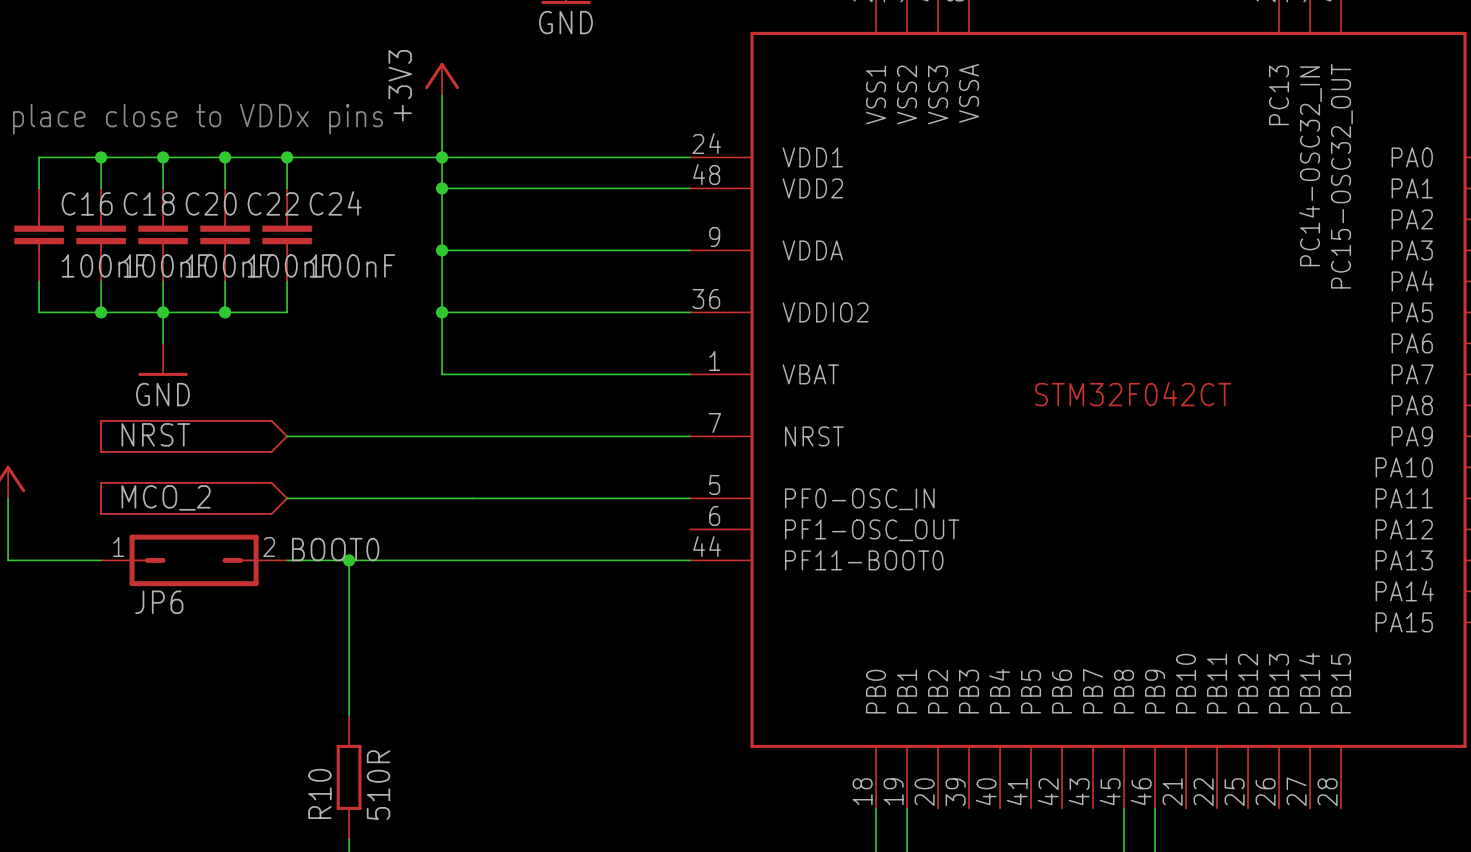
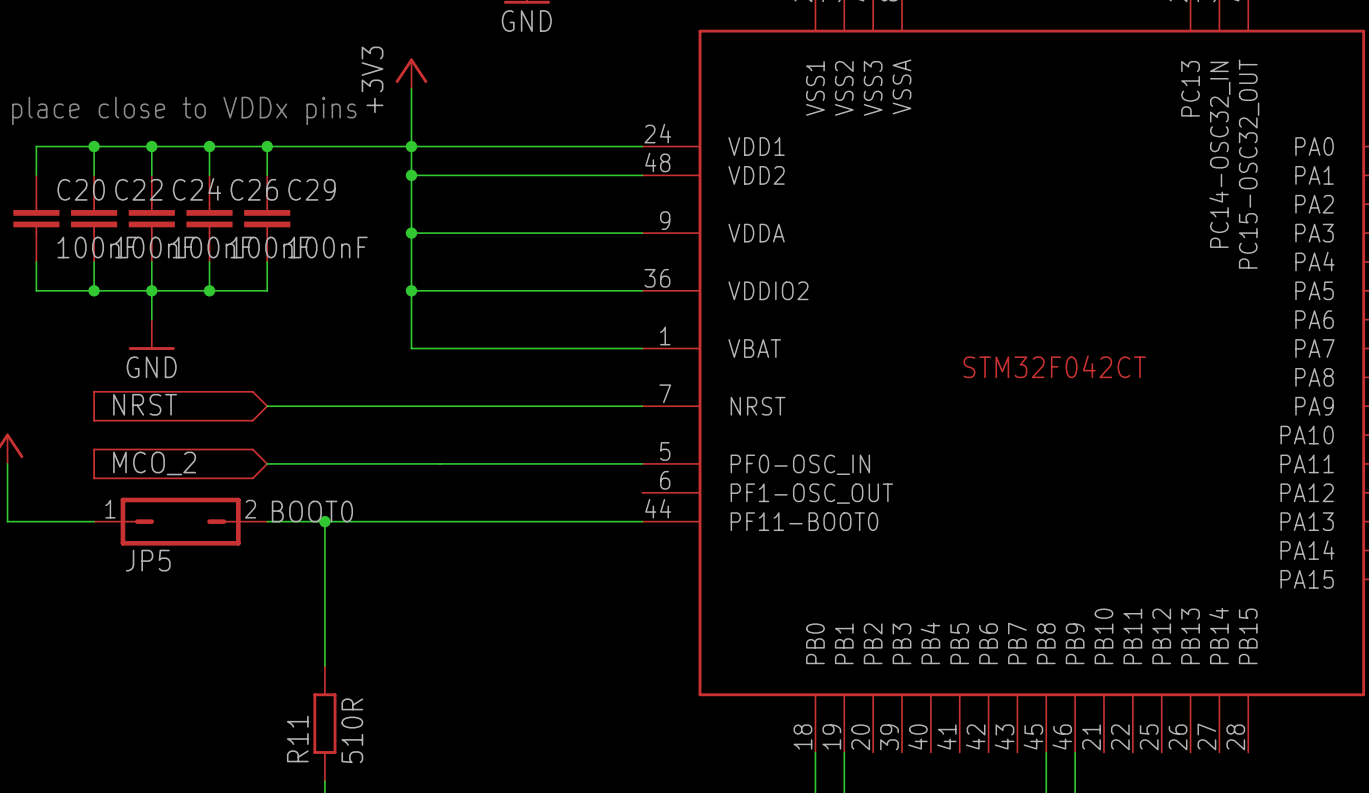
C16 name: C16 (87, 203) -> C20 (81, 189)
C18 name: C18 (149, 203) -> C22 (138, 189)
C20 name: C20 (211, 203) -> C24 (197, 189)
C22 name: C22 (273, 203) -> C26 (254, 189)
C24 name: C24 (335, 203) -> C29 (311, 189)
JP6 name: JP6 (159, 602) -> JP5 (148, 560)
R10 name: R10 (319, 793) -> R11 (297, 739)

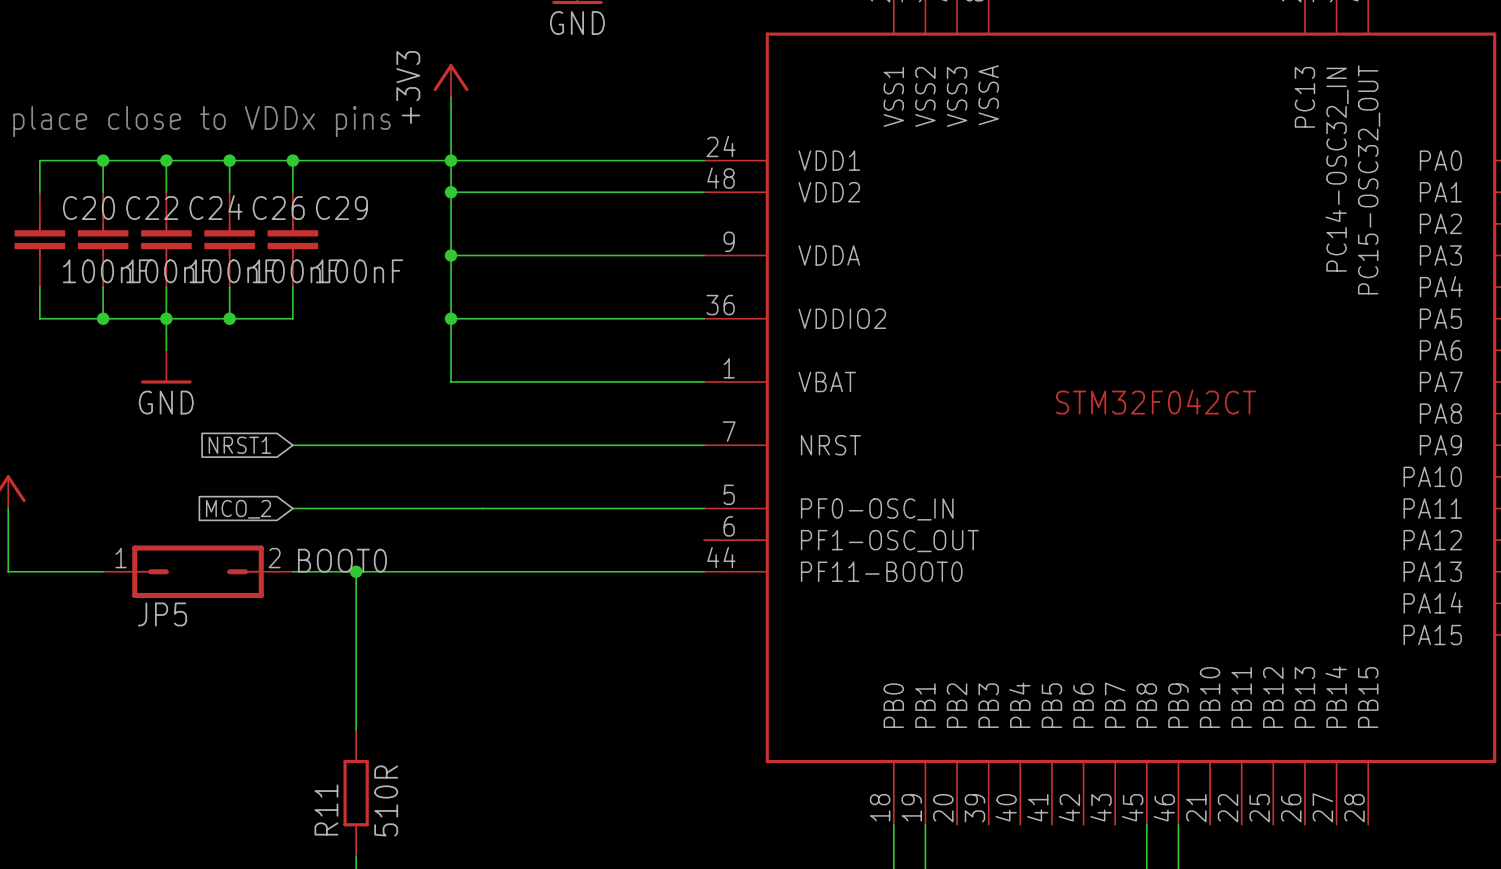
part: NRST (180, 406) -> none
global label: none -> NRST1 (239, 445)
part: MCO_2 (180, 463) -> none
global label: none -> MCO_2 (238, 509)

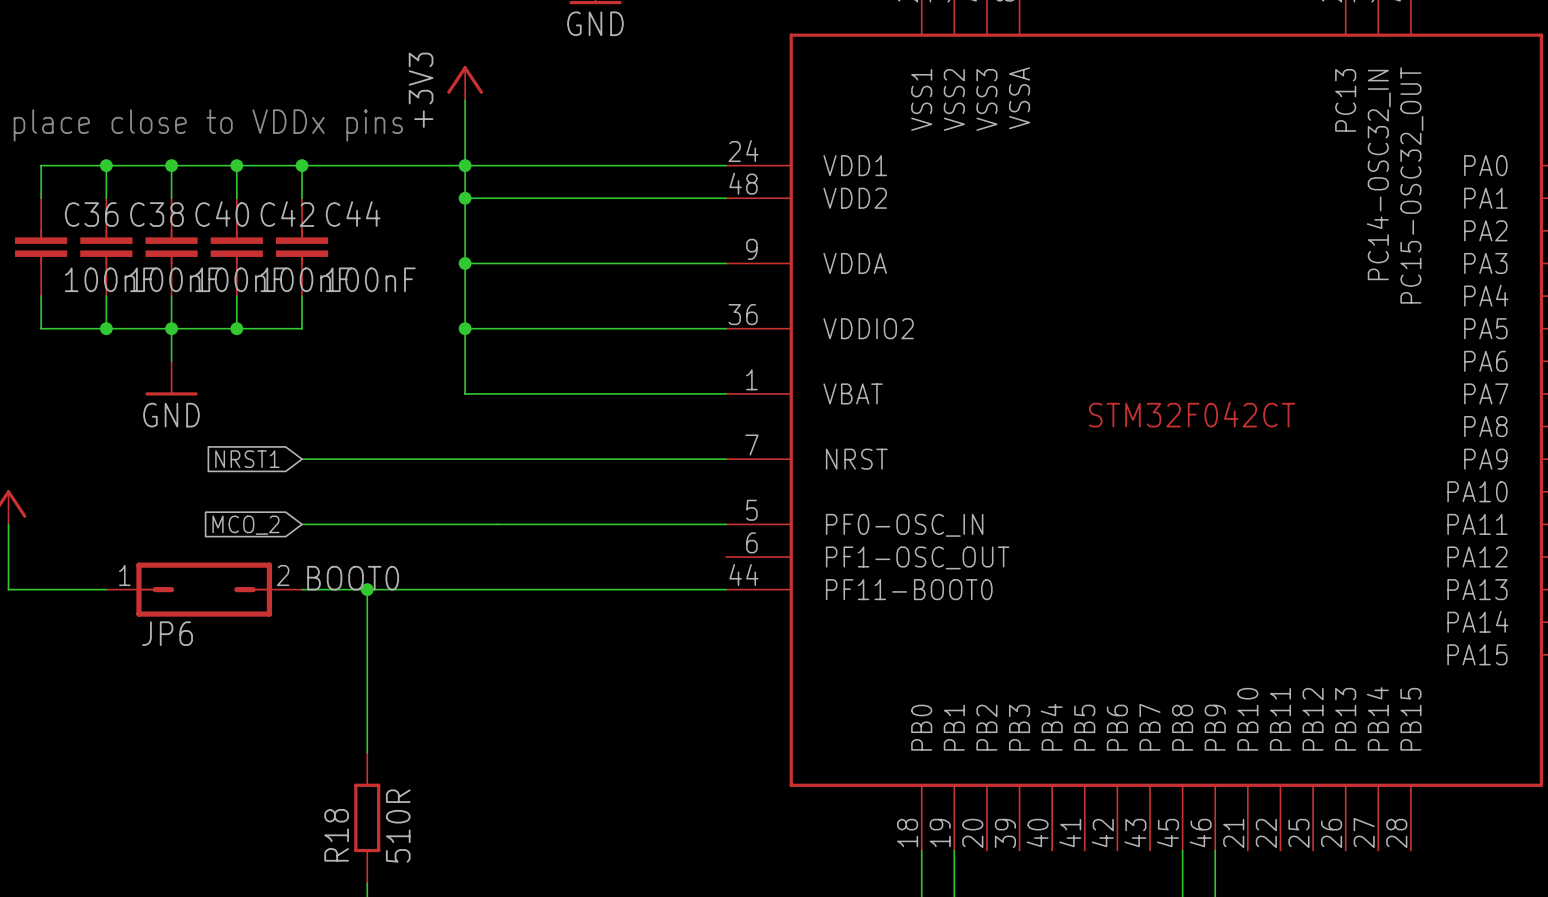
C24 name: C24 (215, 207) -> C40 (222, 214)
C20 name: C20 (88, 208) -> C36 (91, 214)
C22 name: C22 (152, 208) -> C38 (156, 214)
C26 name: C26 (278, 208) -> C42 (287, 214)
C29 name: C29 (341, 208) -> C44 (353, 214)
JP5 name: JP5 (162, 614) -> JP6 (167, 633)
R11 name: R11 (326, 810) -> R18 (336, 835)

